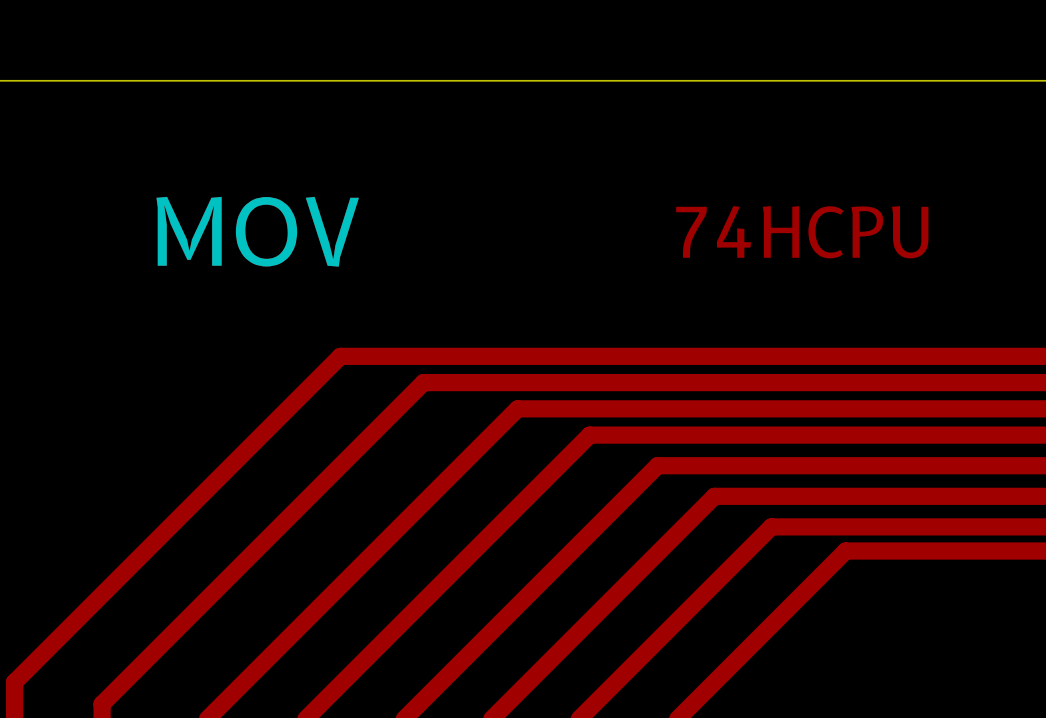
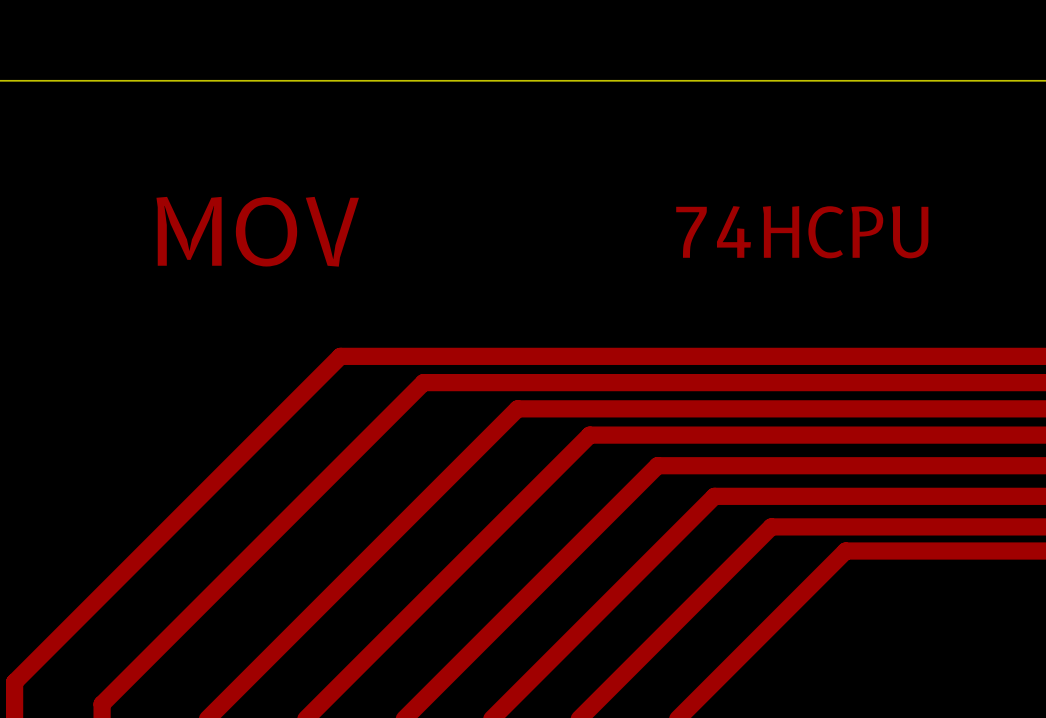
text: MOV (257, 231) -> none

